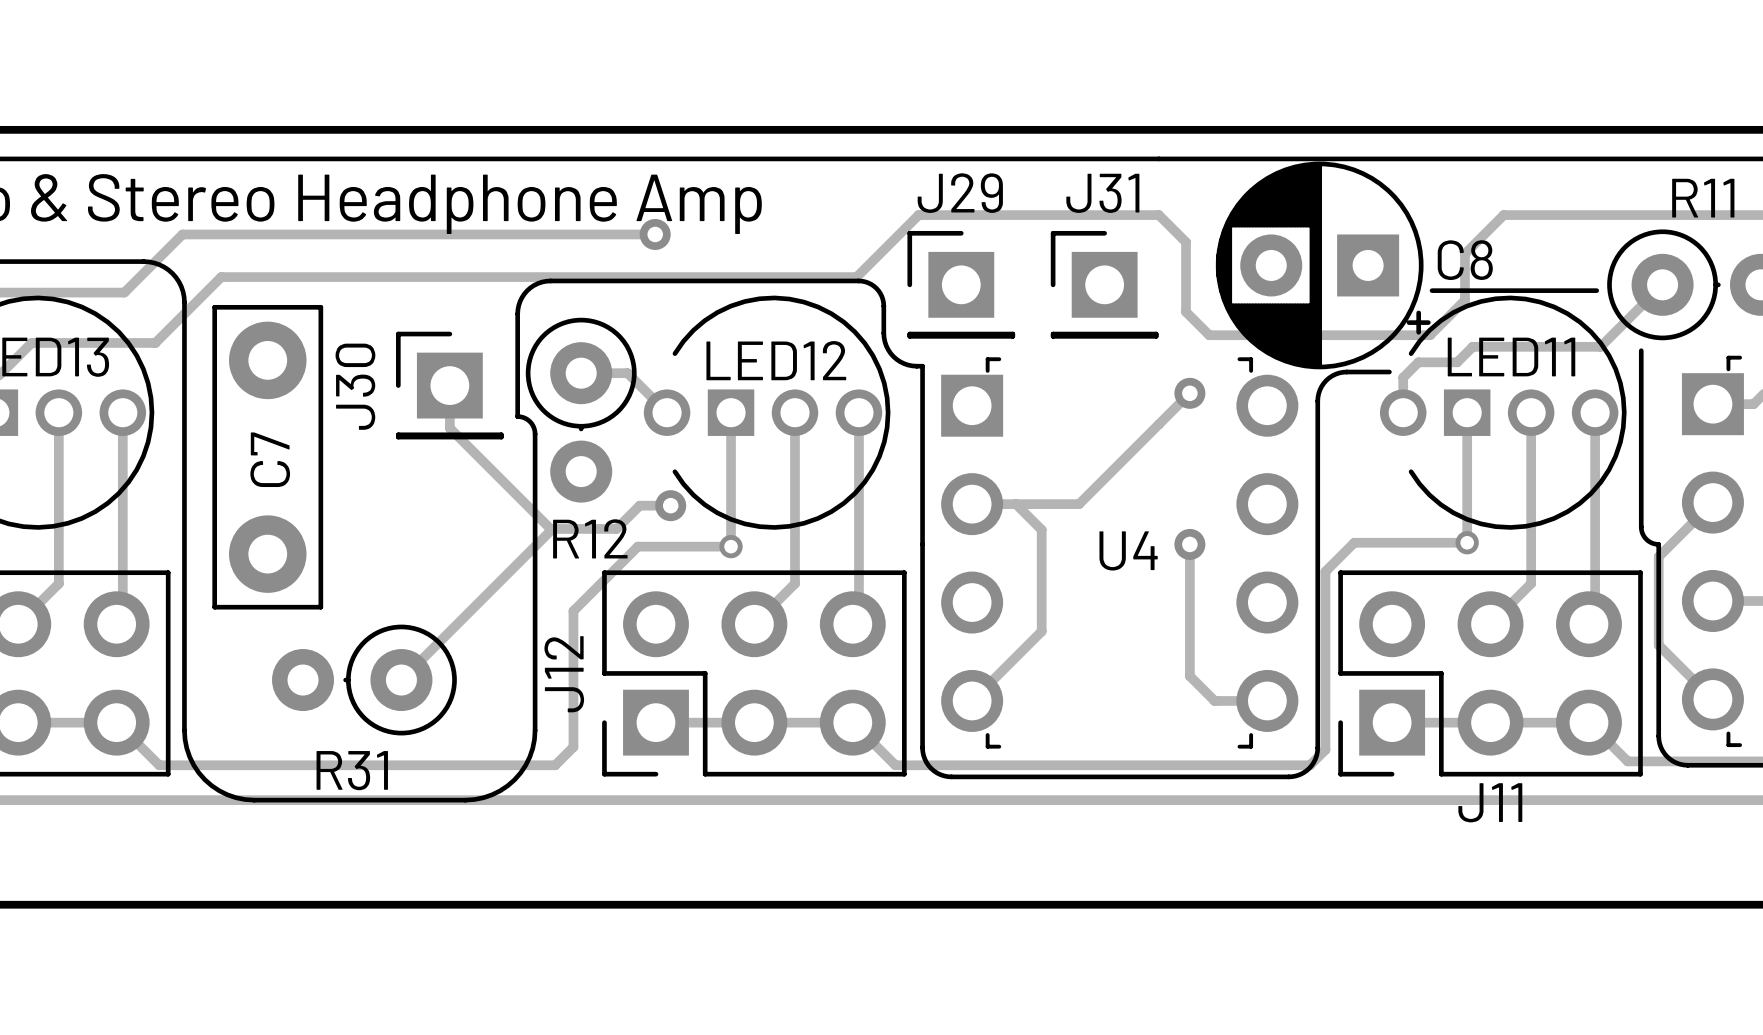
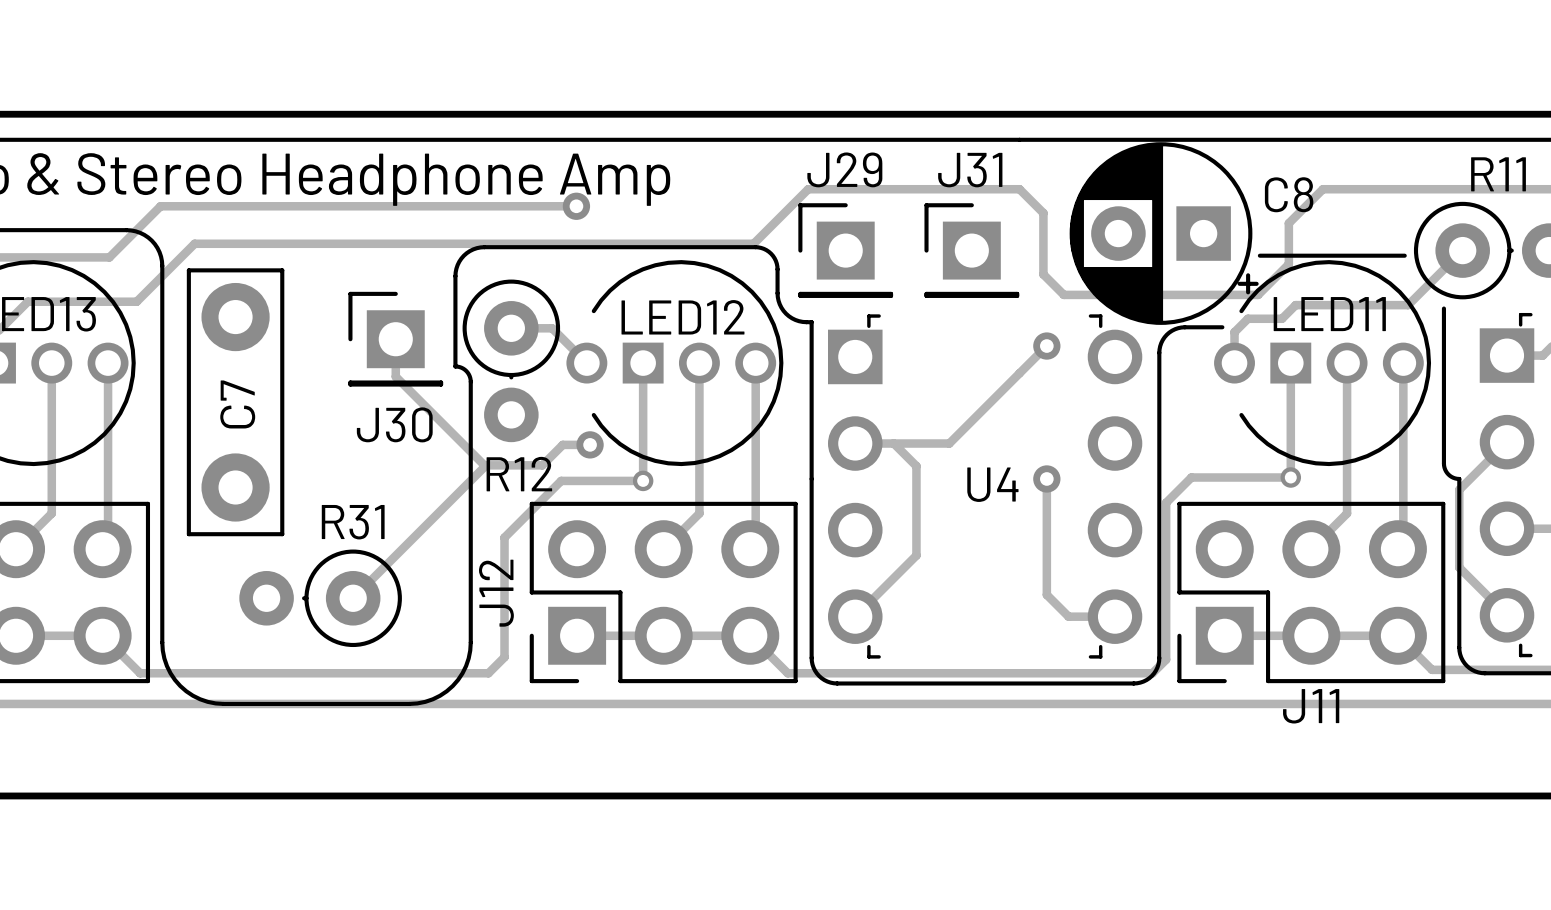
C8 name position: C8 (1465, 260) -> C8 (1289, 194)
J30 name rotation: 0° (355, 386) -> 90° clockwise (394, 424)
J30 name position: J30 (355, 386) -> J30 (394, 424)
R31 name position: R31 (352, 770) -> R31 (353, 522)

